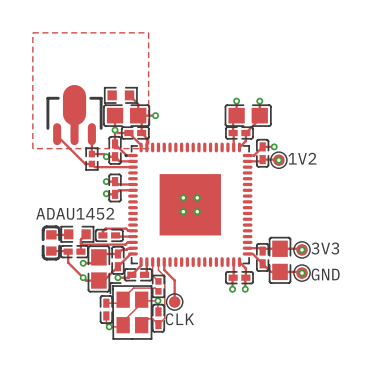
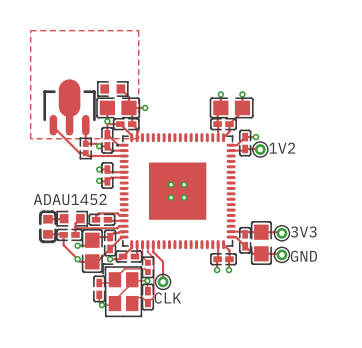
part footprint: [270, 151, 288, 169] -> [252, 141, 269, 158]
via: (278, 160) -> none
part footprint: [293, 241, 311, 259] -> [273, 225, 291, 242]
via: (302, 249) -> none
part footprint: [293, 264, 311, 282] -> [273, 246, 291, 264]
via: (302, 273) -> none
part footprint: [165, 293, 184, 311] -> [154, 273, 172, 291]

